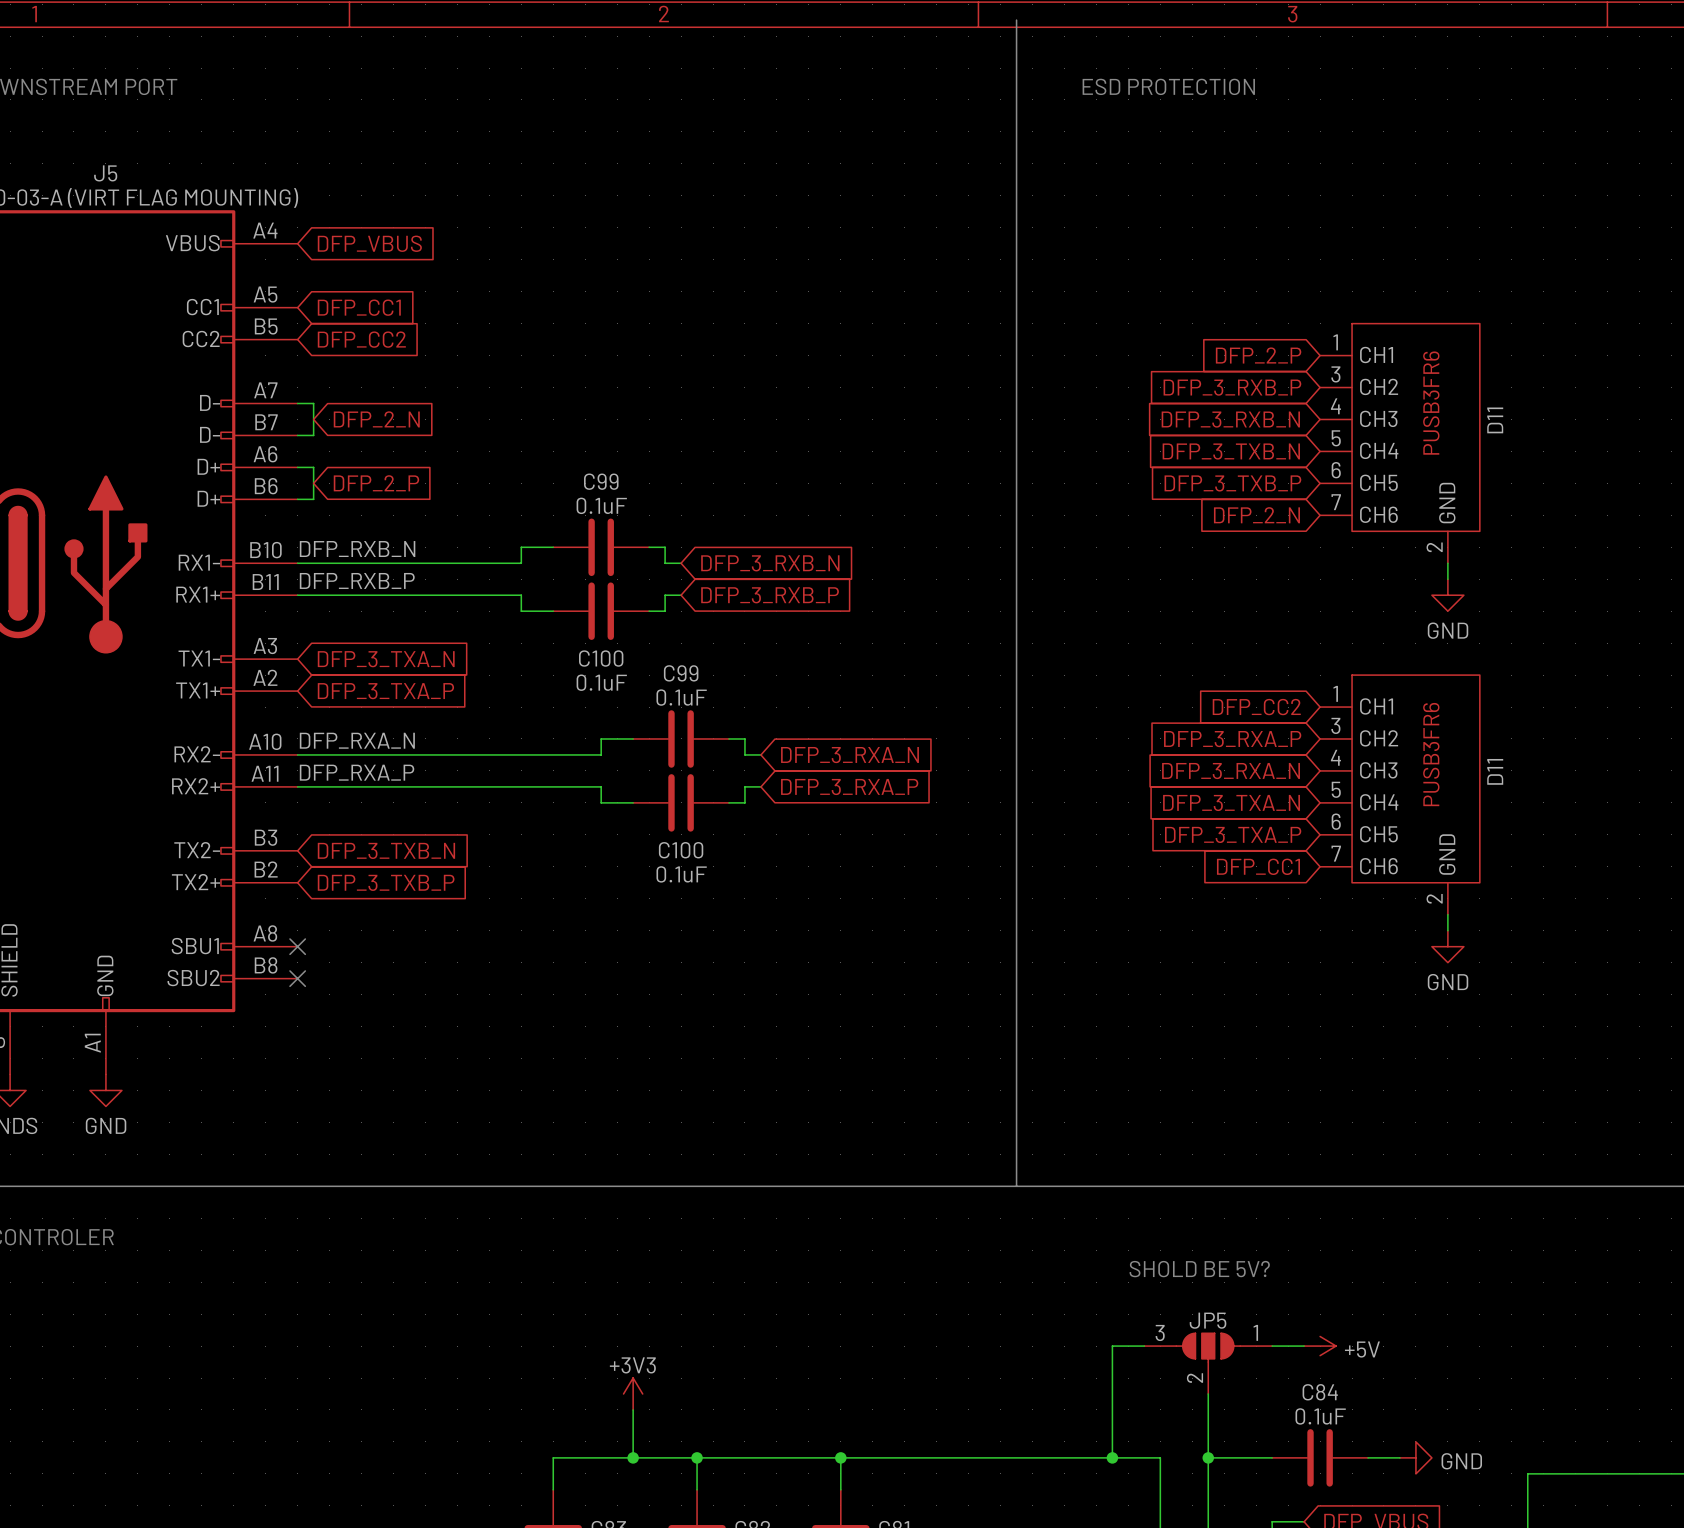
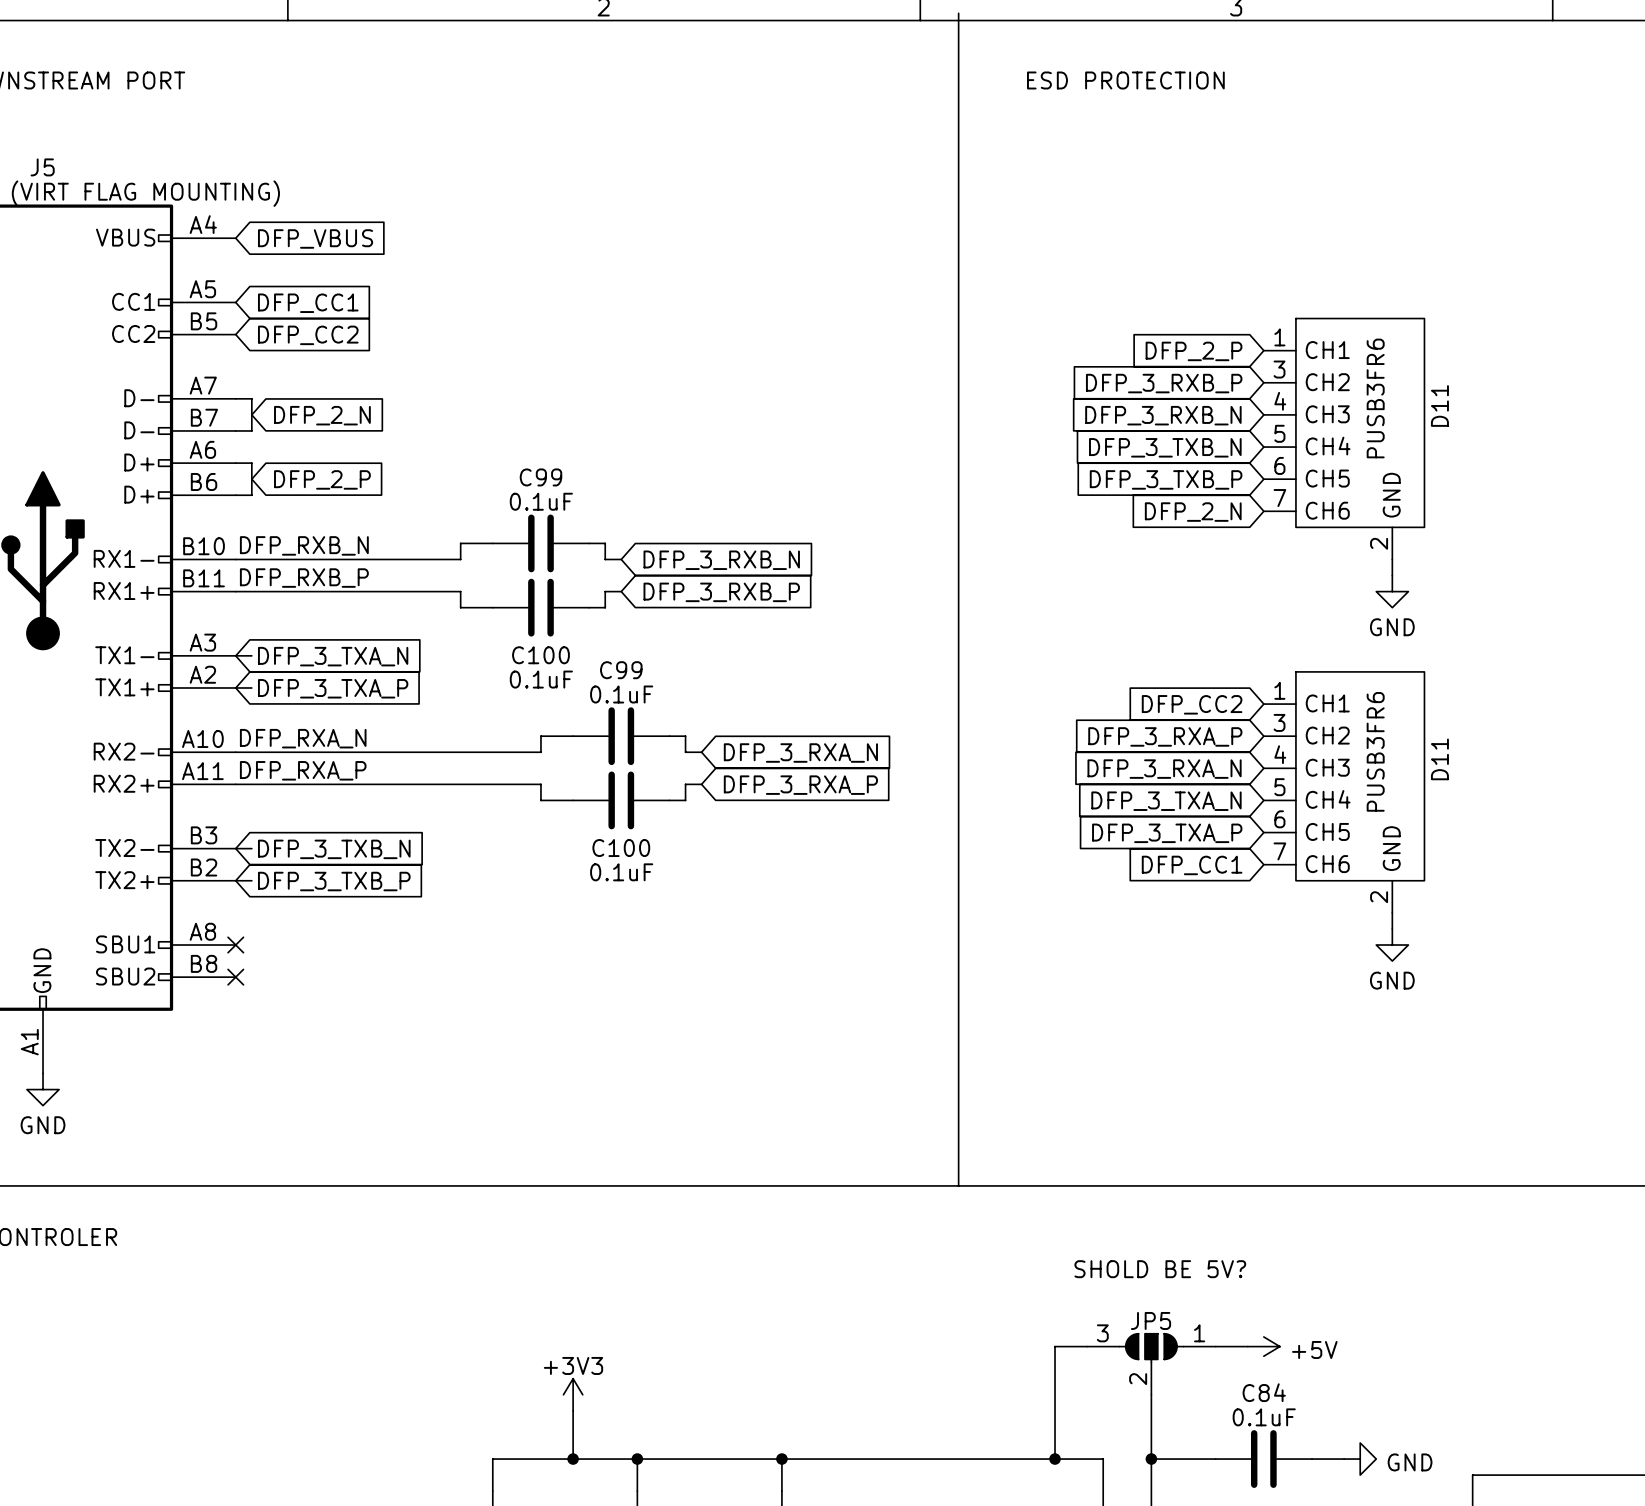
wire: none -> (235, 655) (251, 655)
wire: none -> (235, 687) (251, 687)
wire: none -> (235, 848) (251, 848)
wire: none -> (235, 880) (251, 880)

